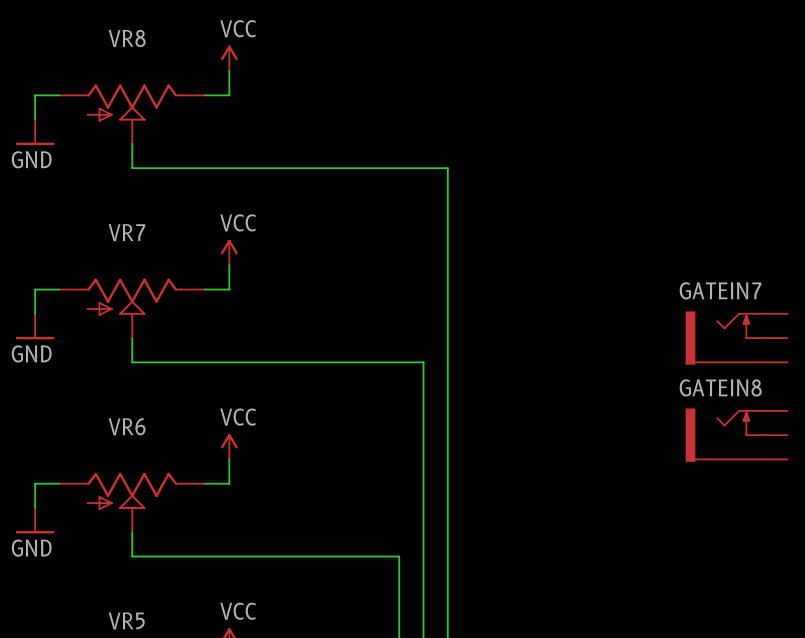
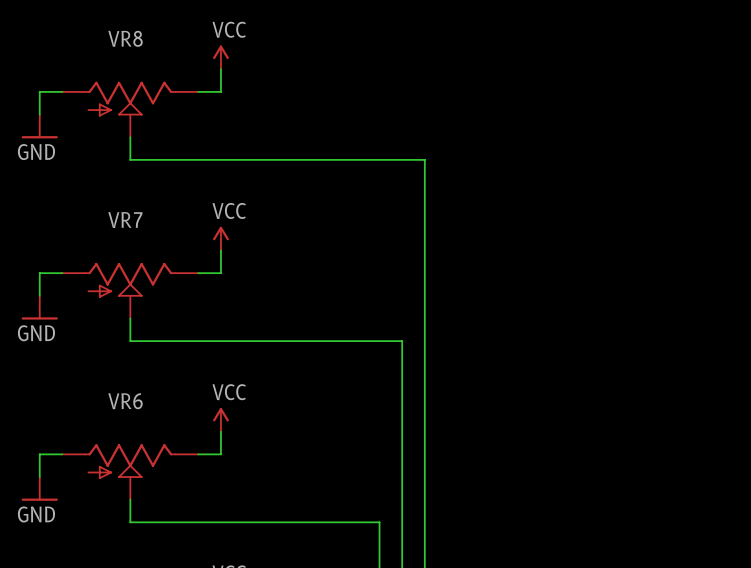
GATEIN7: (736, 338) -> none
GATEIN8: (736, 435) -> none

